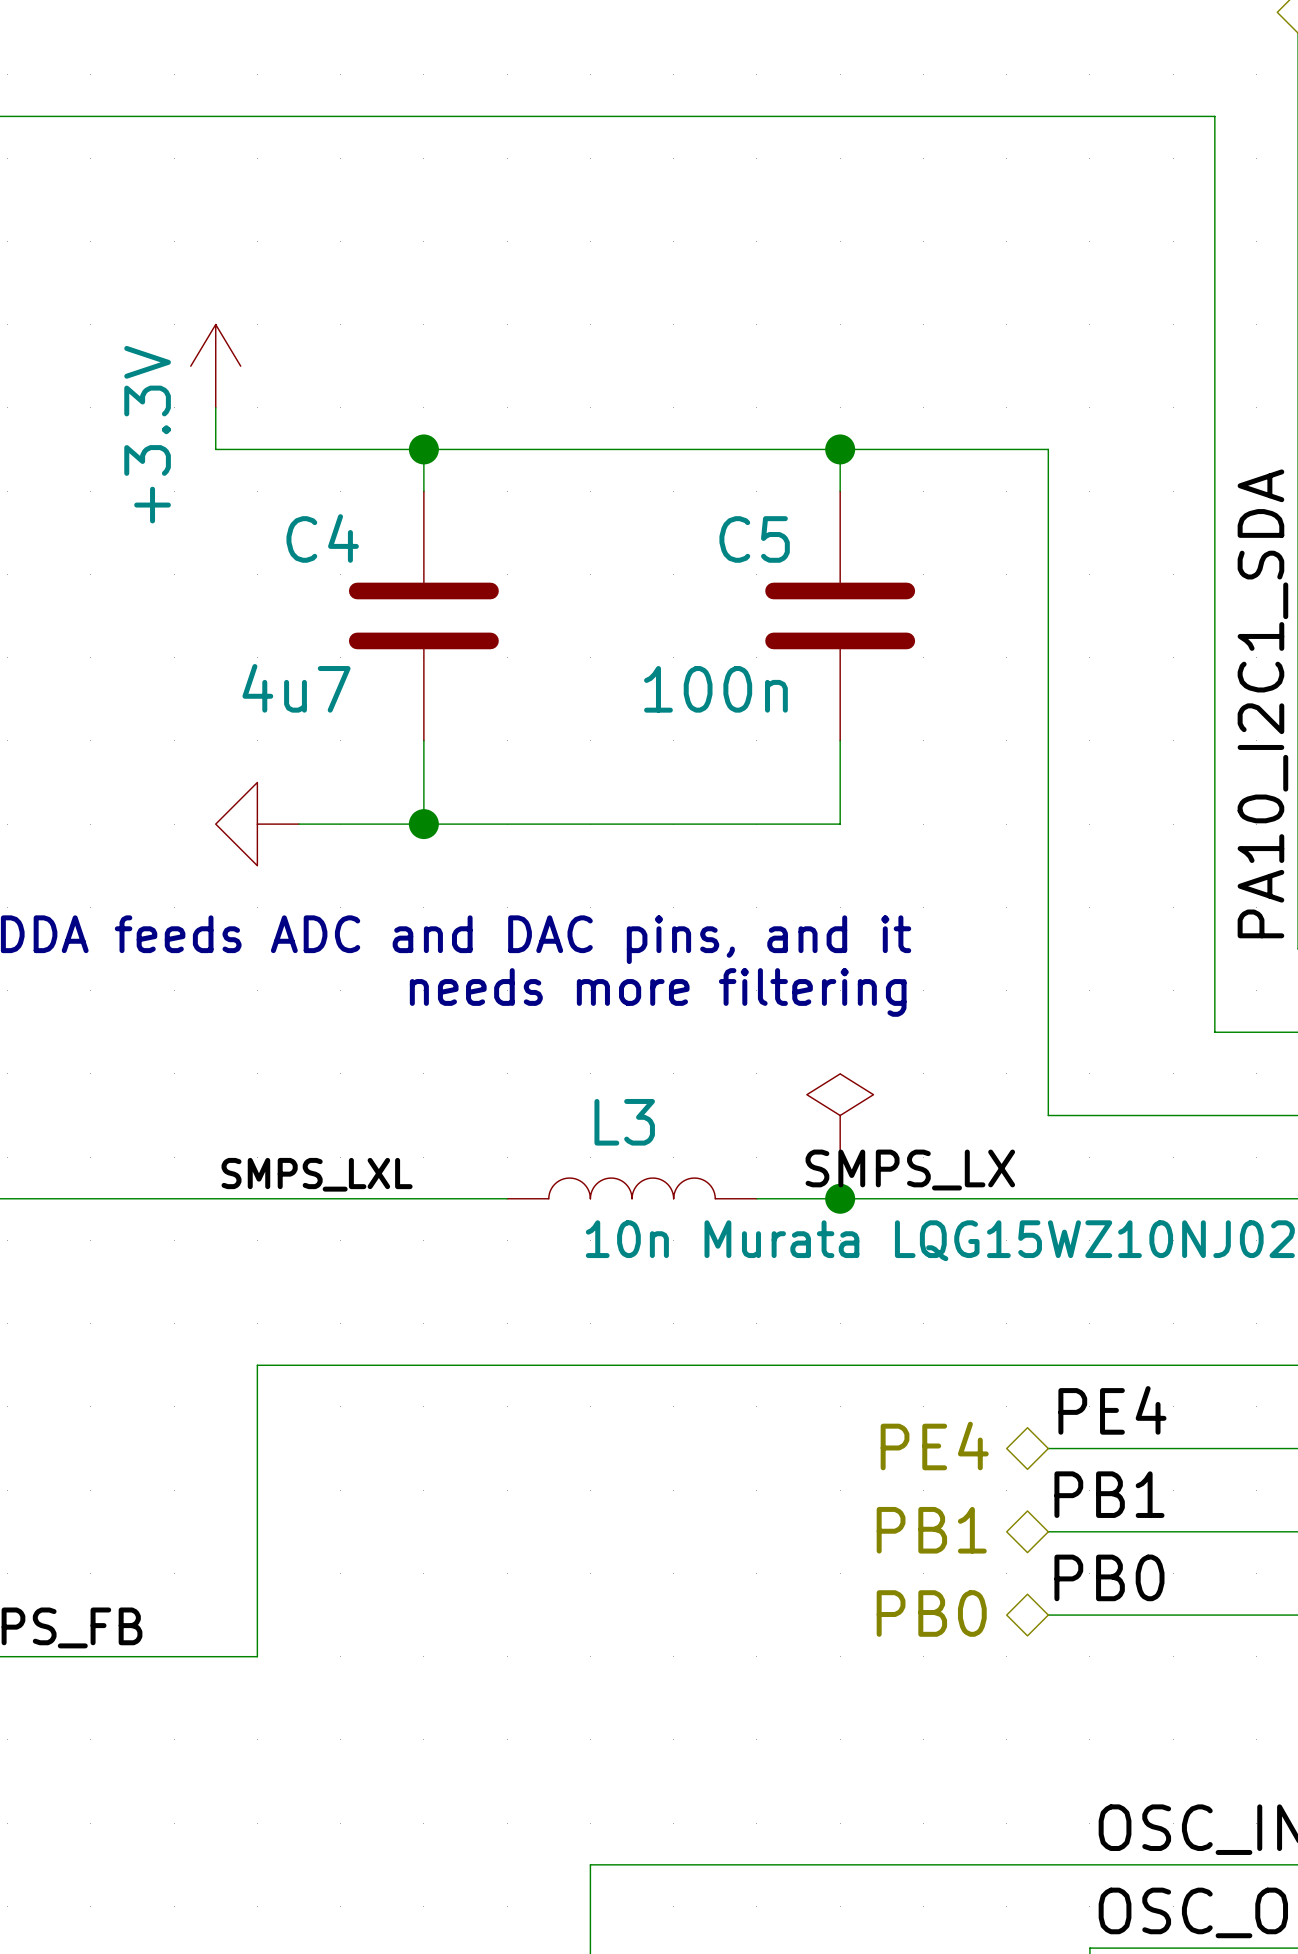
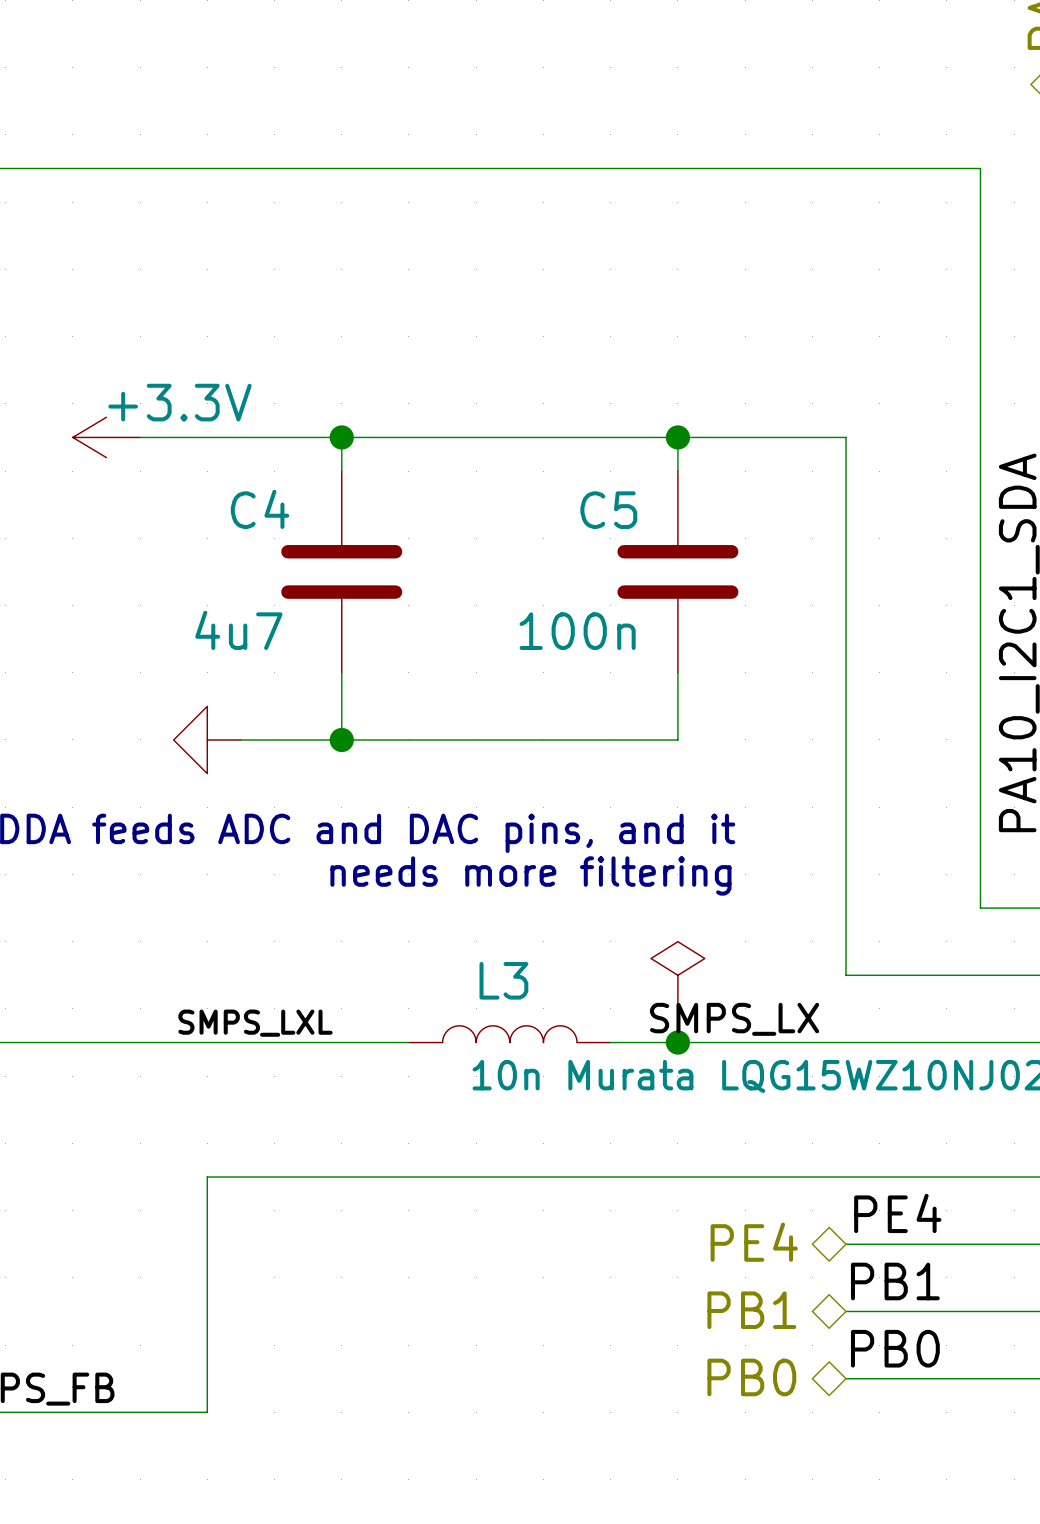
power symbol rotation: 0° (215, 366) -> 90° counterclockwise (106, 437)
power symbol position: +3.3V (215, 366) -> +3.3V (106, 437)
wire: (215, 407) (215, 449) -> (140, 437) (173, 437)
power symbol text position: +3.3V (147, 434) -> +3.3V (180, 402)

